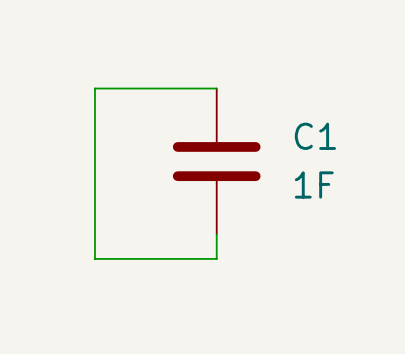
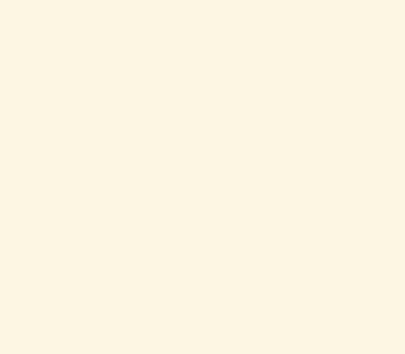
wire: (216, 88) (94, 88) (94, 258) (216, 258) (216, 234) -> none
C1: 1F (216, 161) -> none

